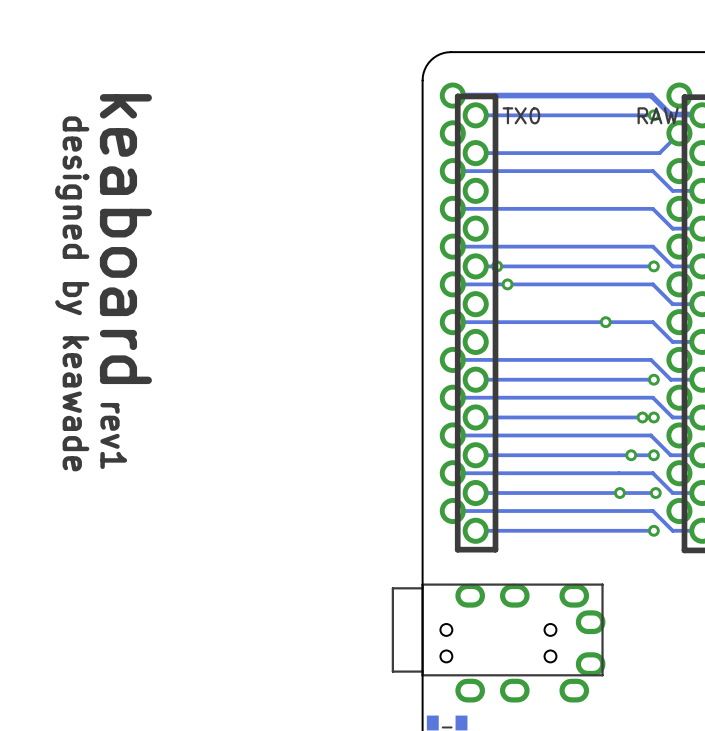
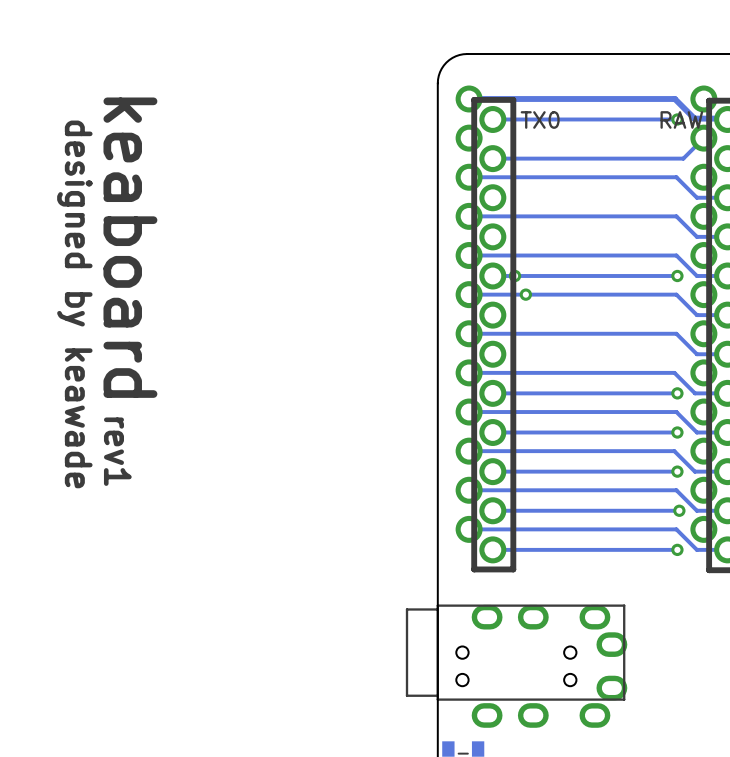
via: (605, 322) -> none
via: (642, 417) -> none
via: (631, 455) -> none
via: (619, 493) -> none

